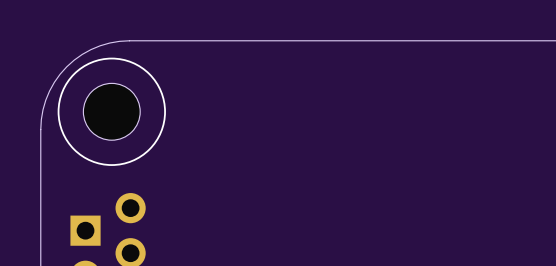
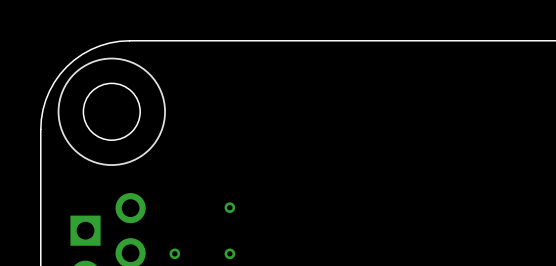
via: none -> (229, 207)
via: none -> (174, 253)
via: none -> (229, 253)

